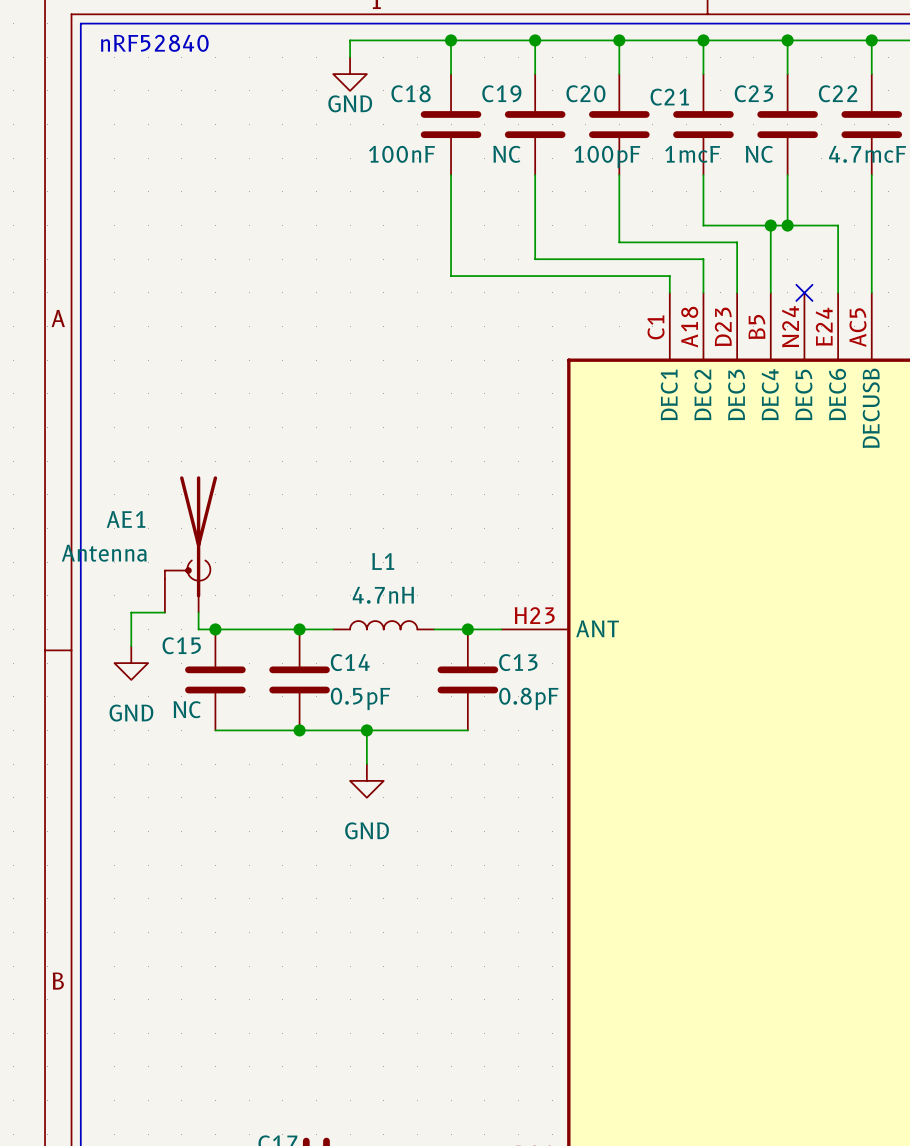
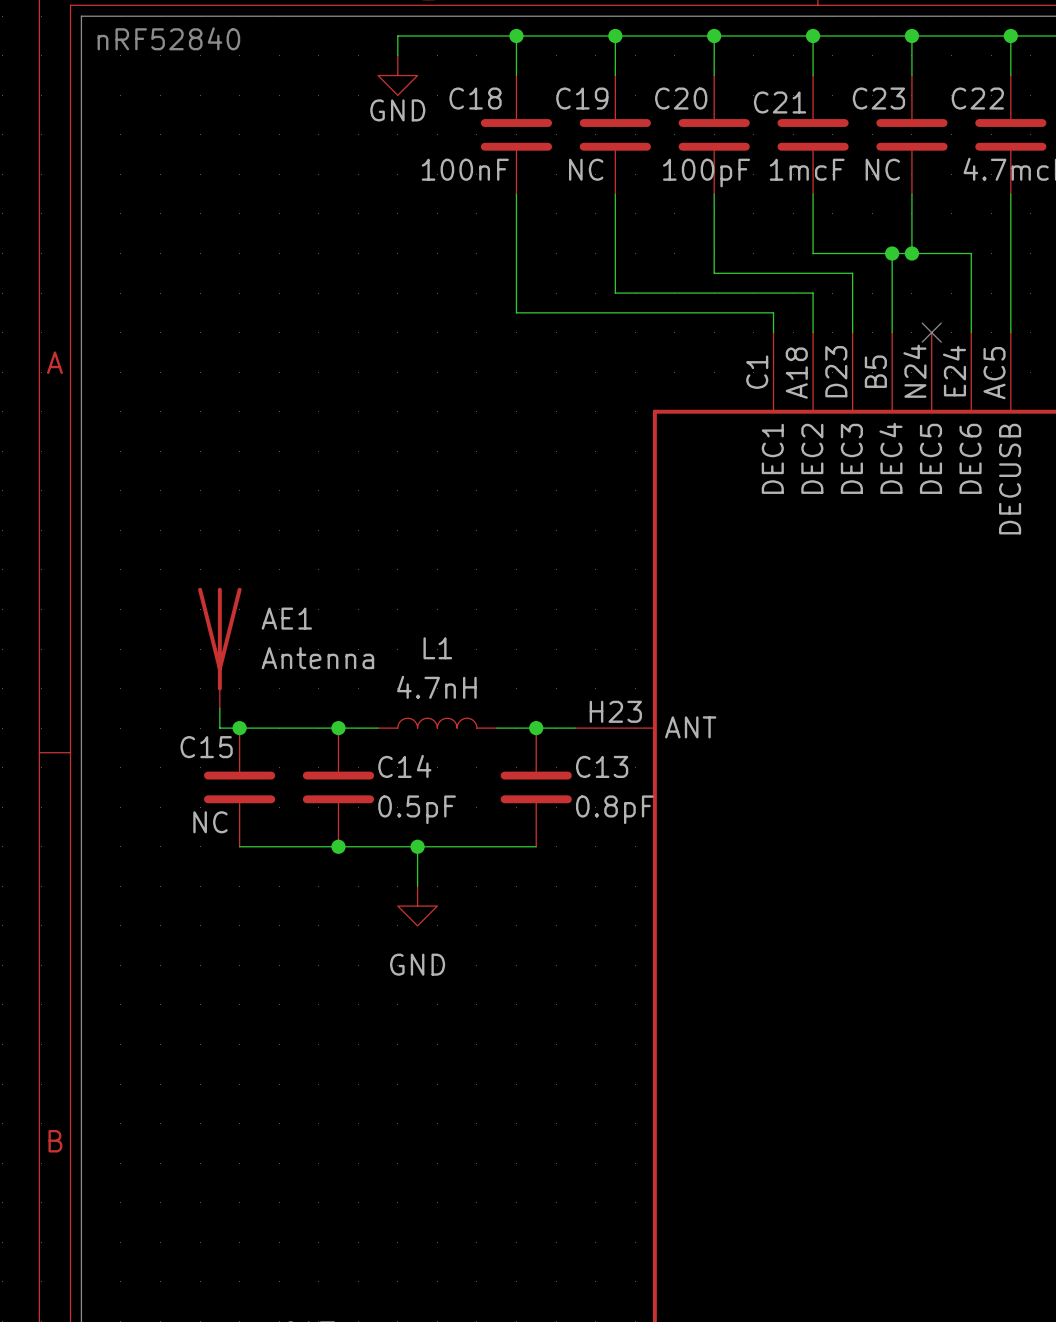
AE1 symbol: [164, 476, 218, 613] -> [198, 587, 242, 709]
AE1 name position: AE1 (126, 519) -> AE1 (286, 618)
AE1 value position: Antenna (104, 553) -> Antenna (317, 658)
wire: (164, 612) (131, 612) (131, 646) -> none
power symbol: GND (131, 663) -> none

